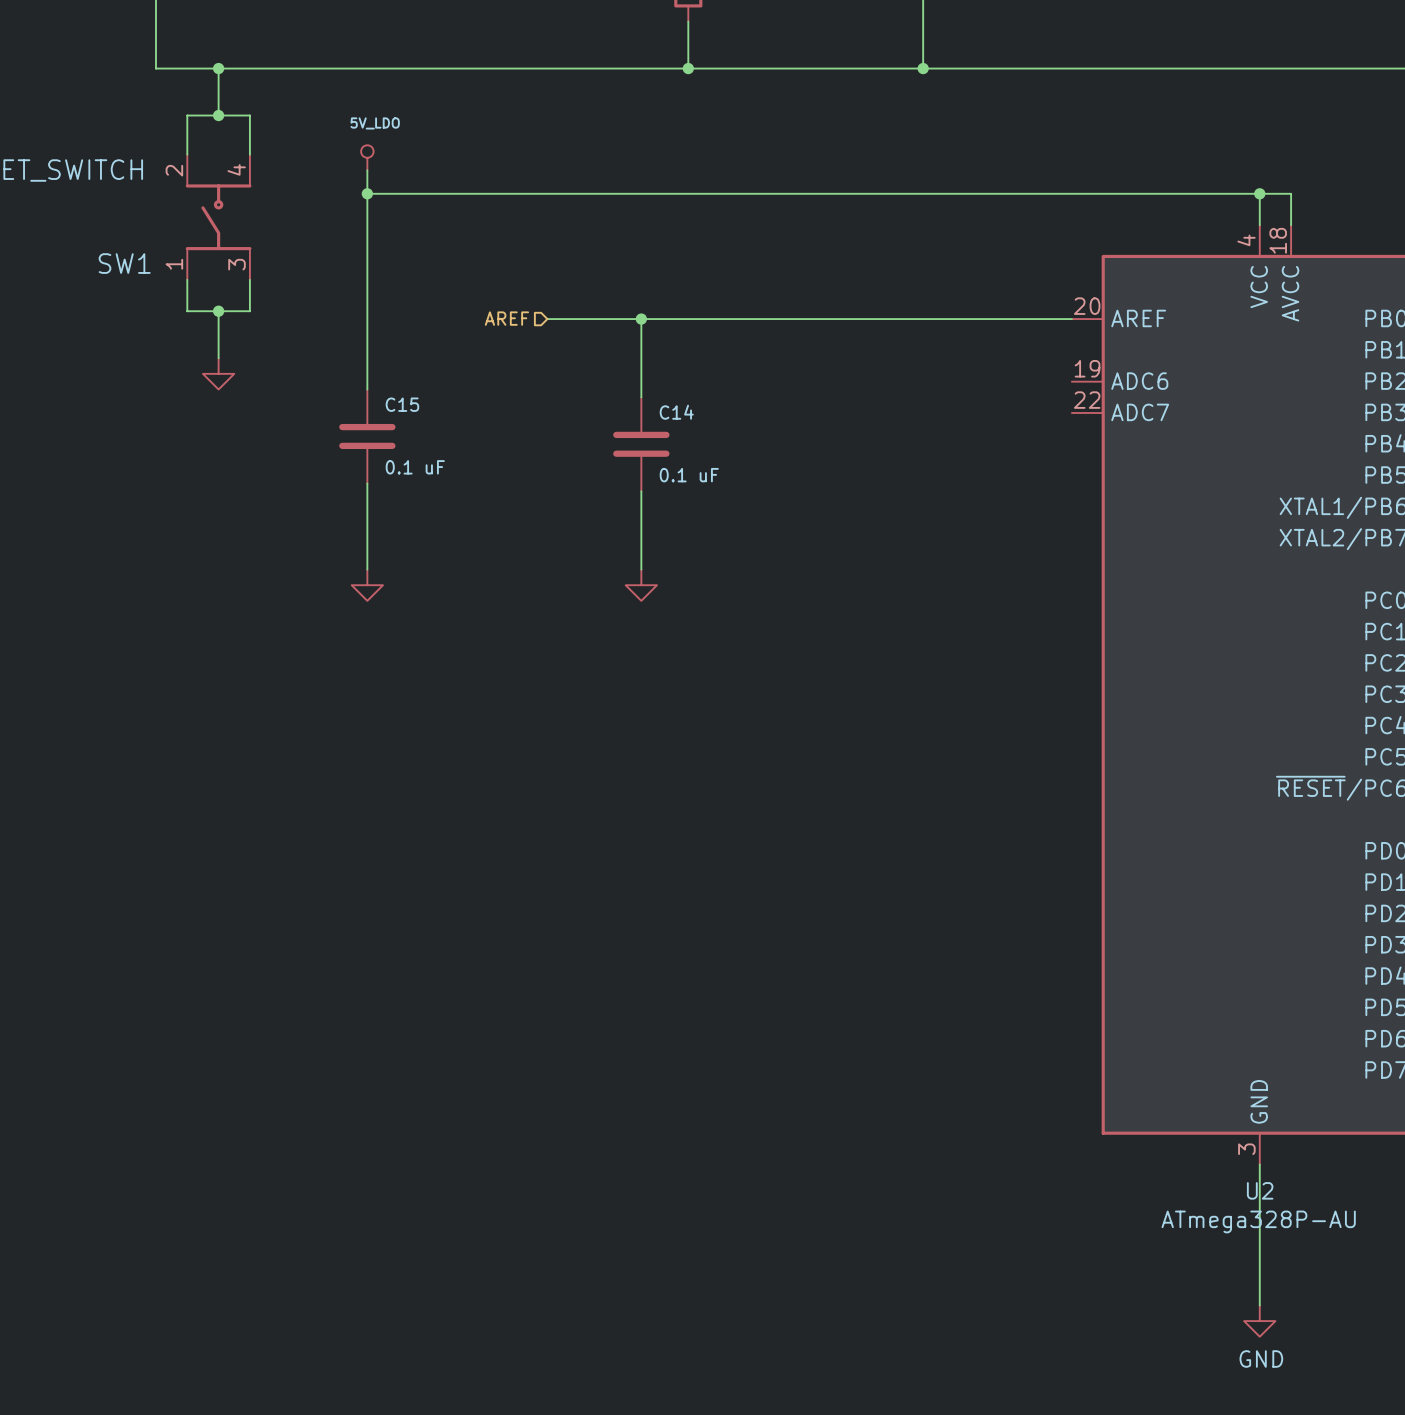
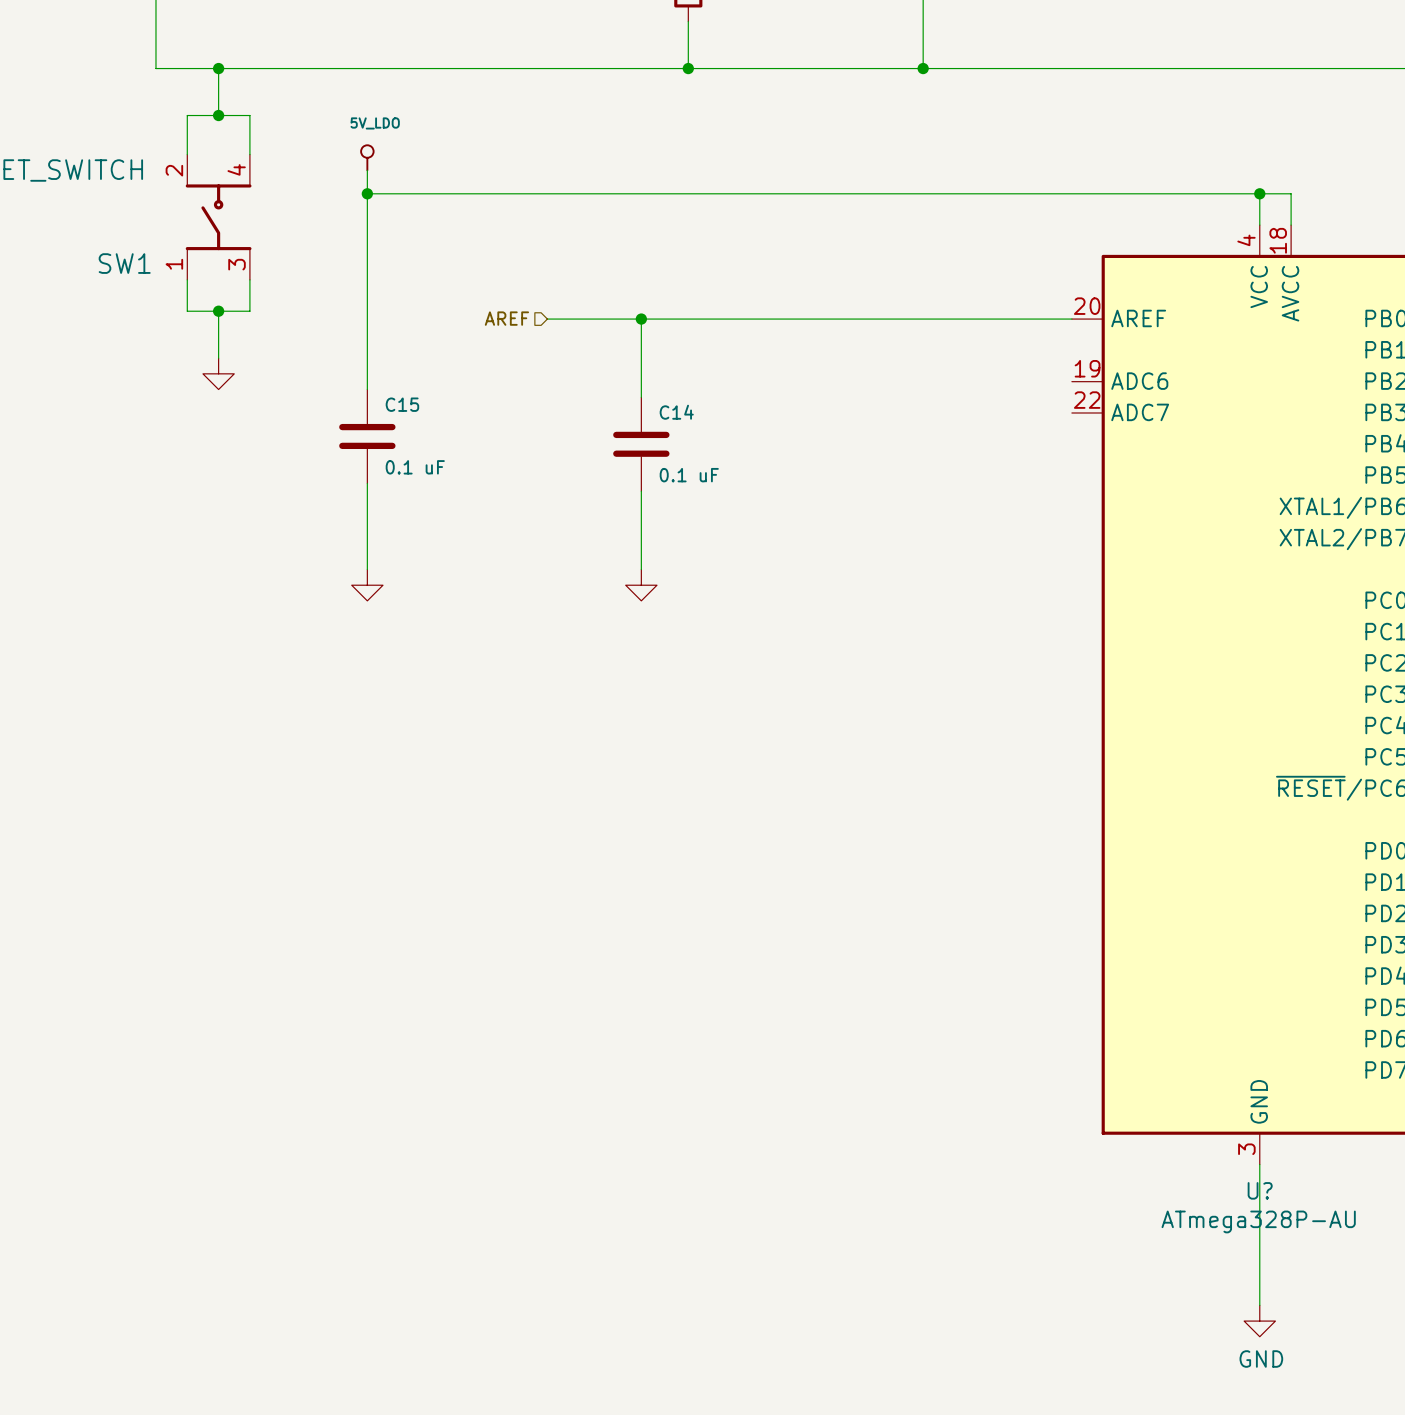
U2 name: U2 (1260, 1190) -> U? (1260, 1190)

